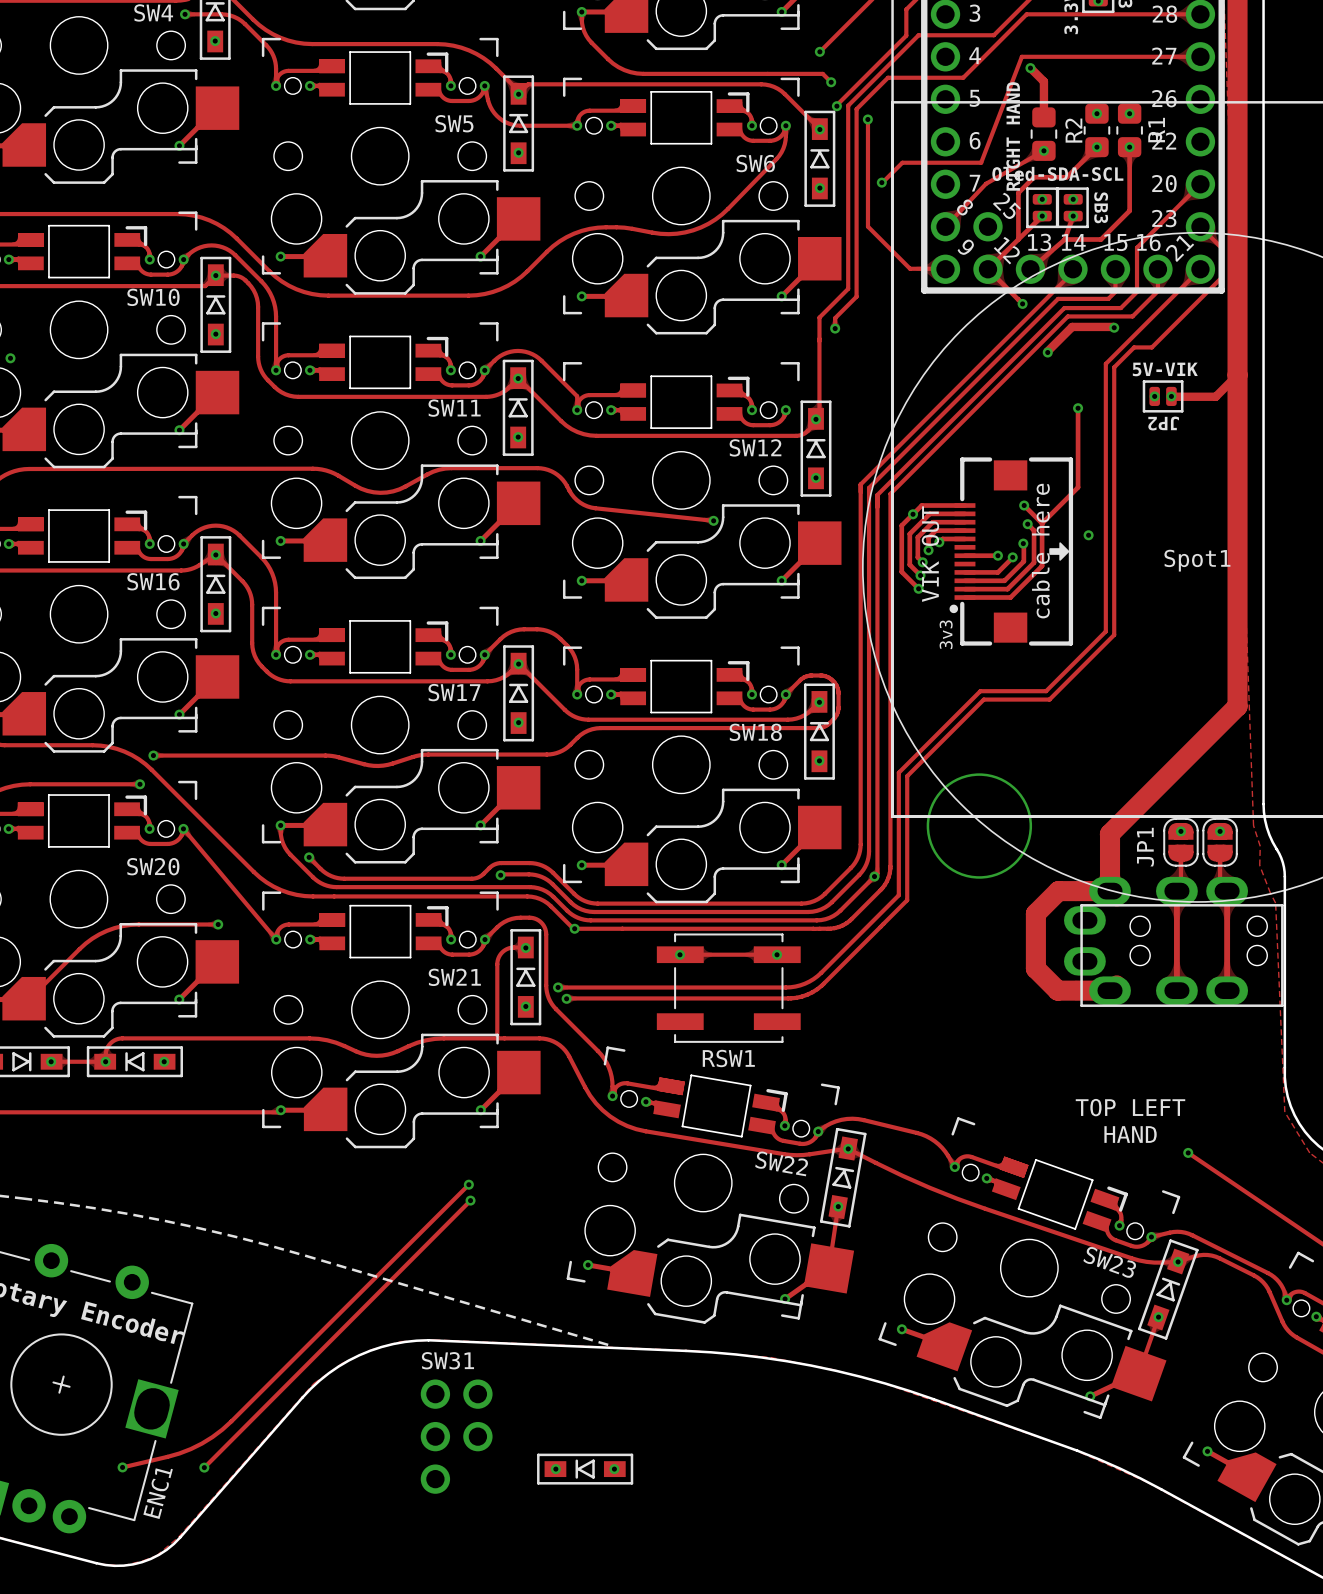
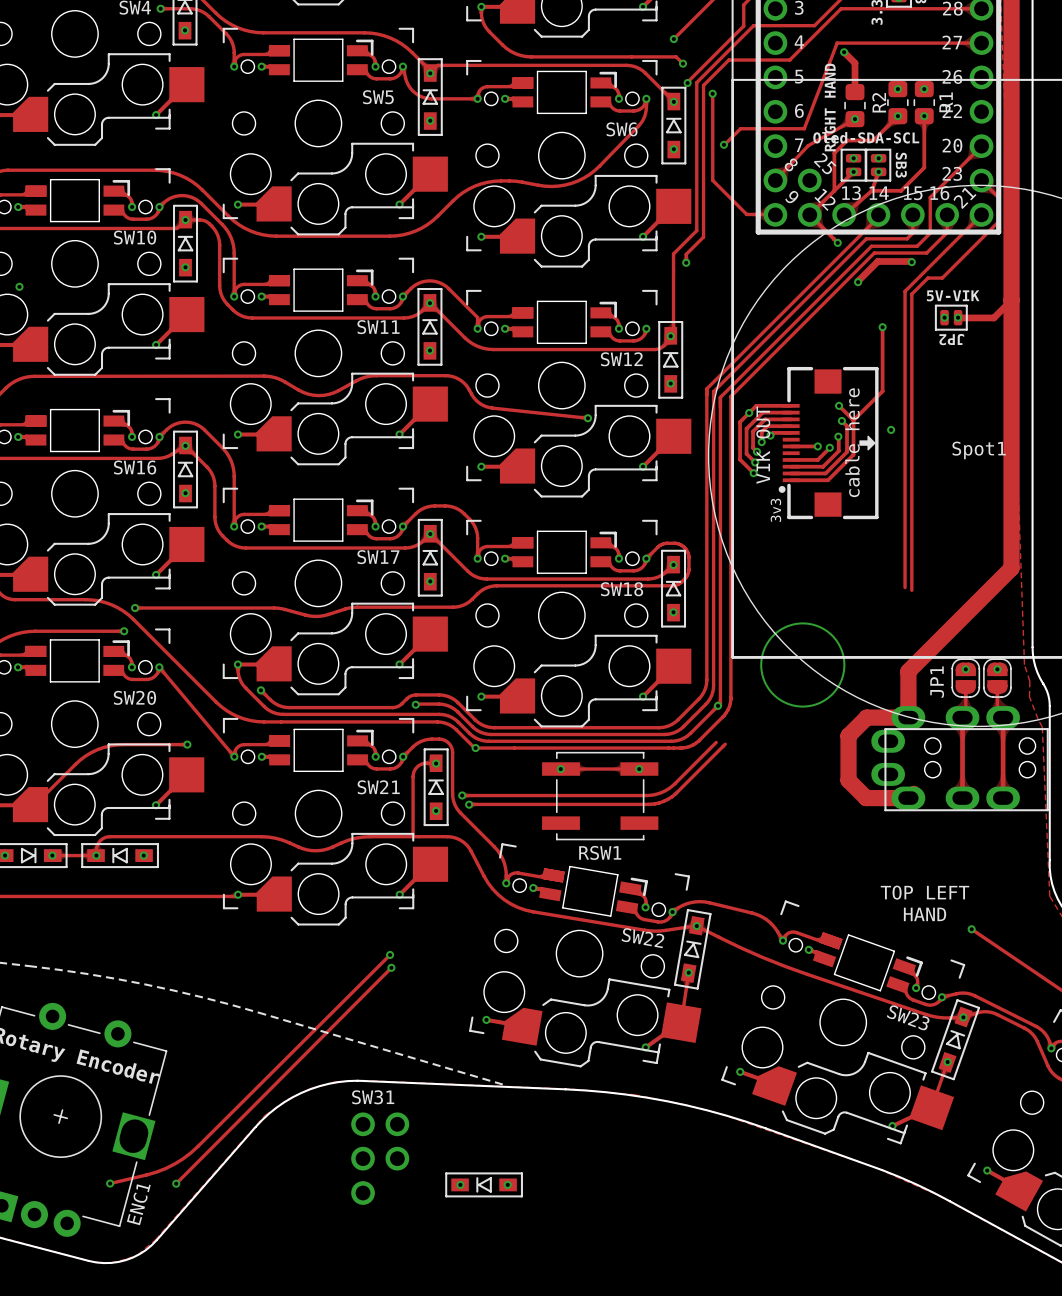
track: (1105, 631) (1046, 691) (980, 691) (898, 772) (898, 895) (872, 921) -> (905, 507) (905, 587)
track: (1114, 634) (1049, 699) (983, 699) (907, 776) (907, 900) (883, 924) -> (911, 510) (911, 590)

